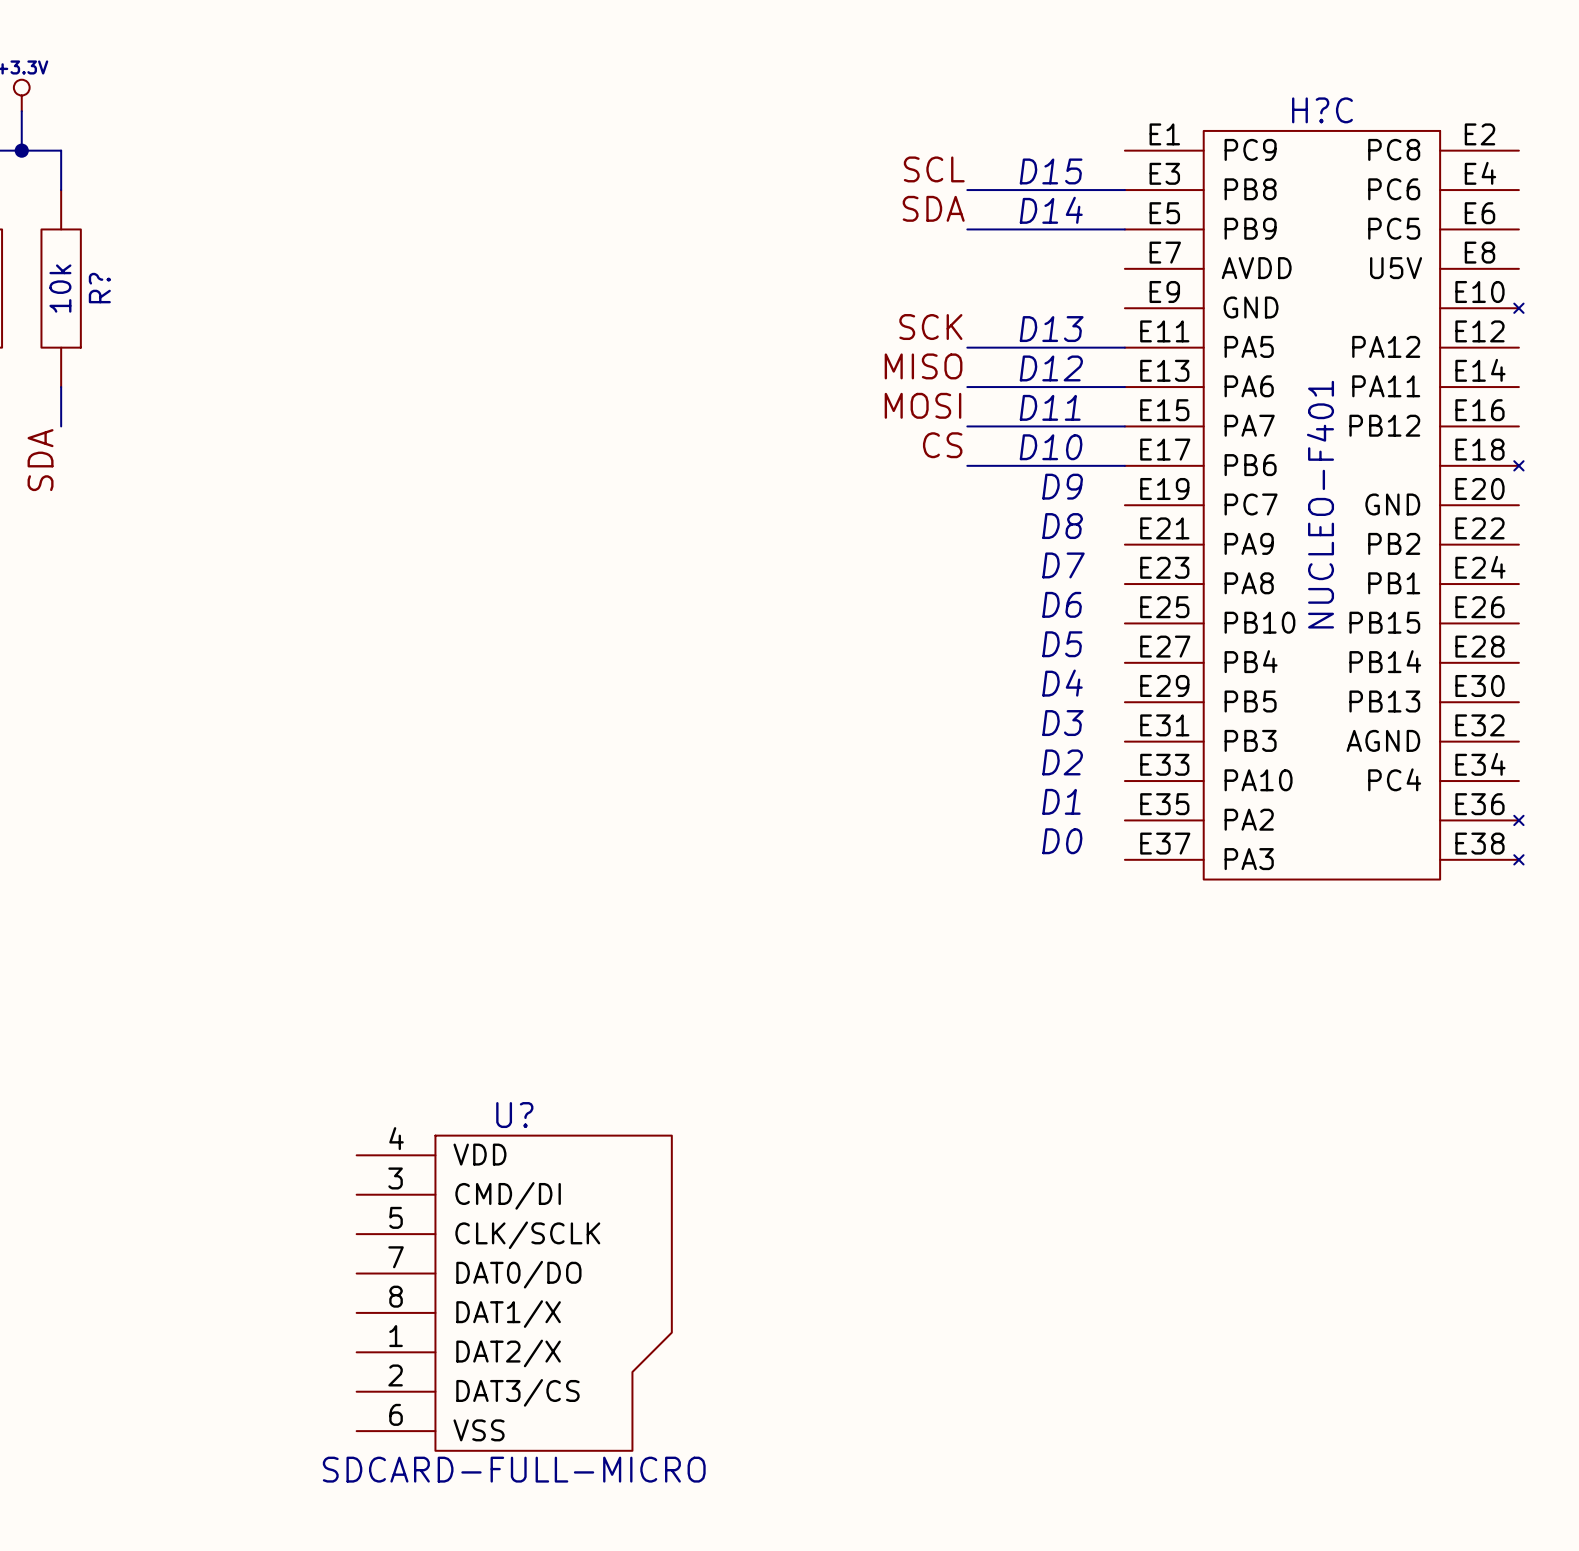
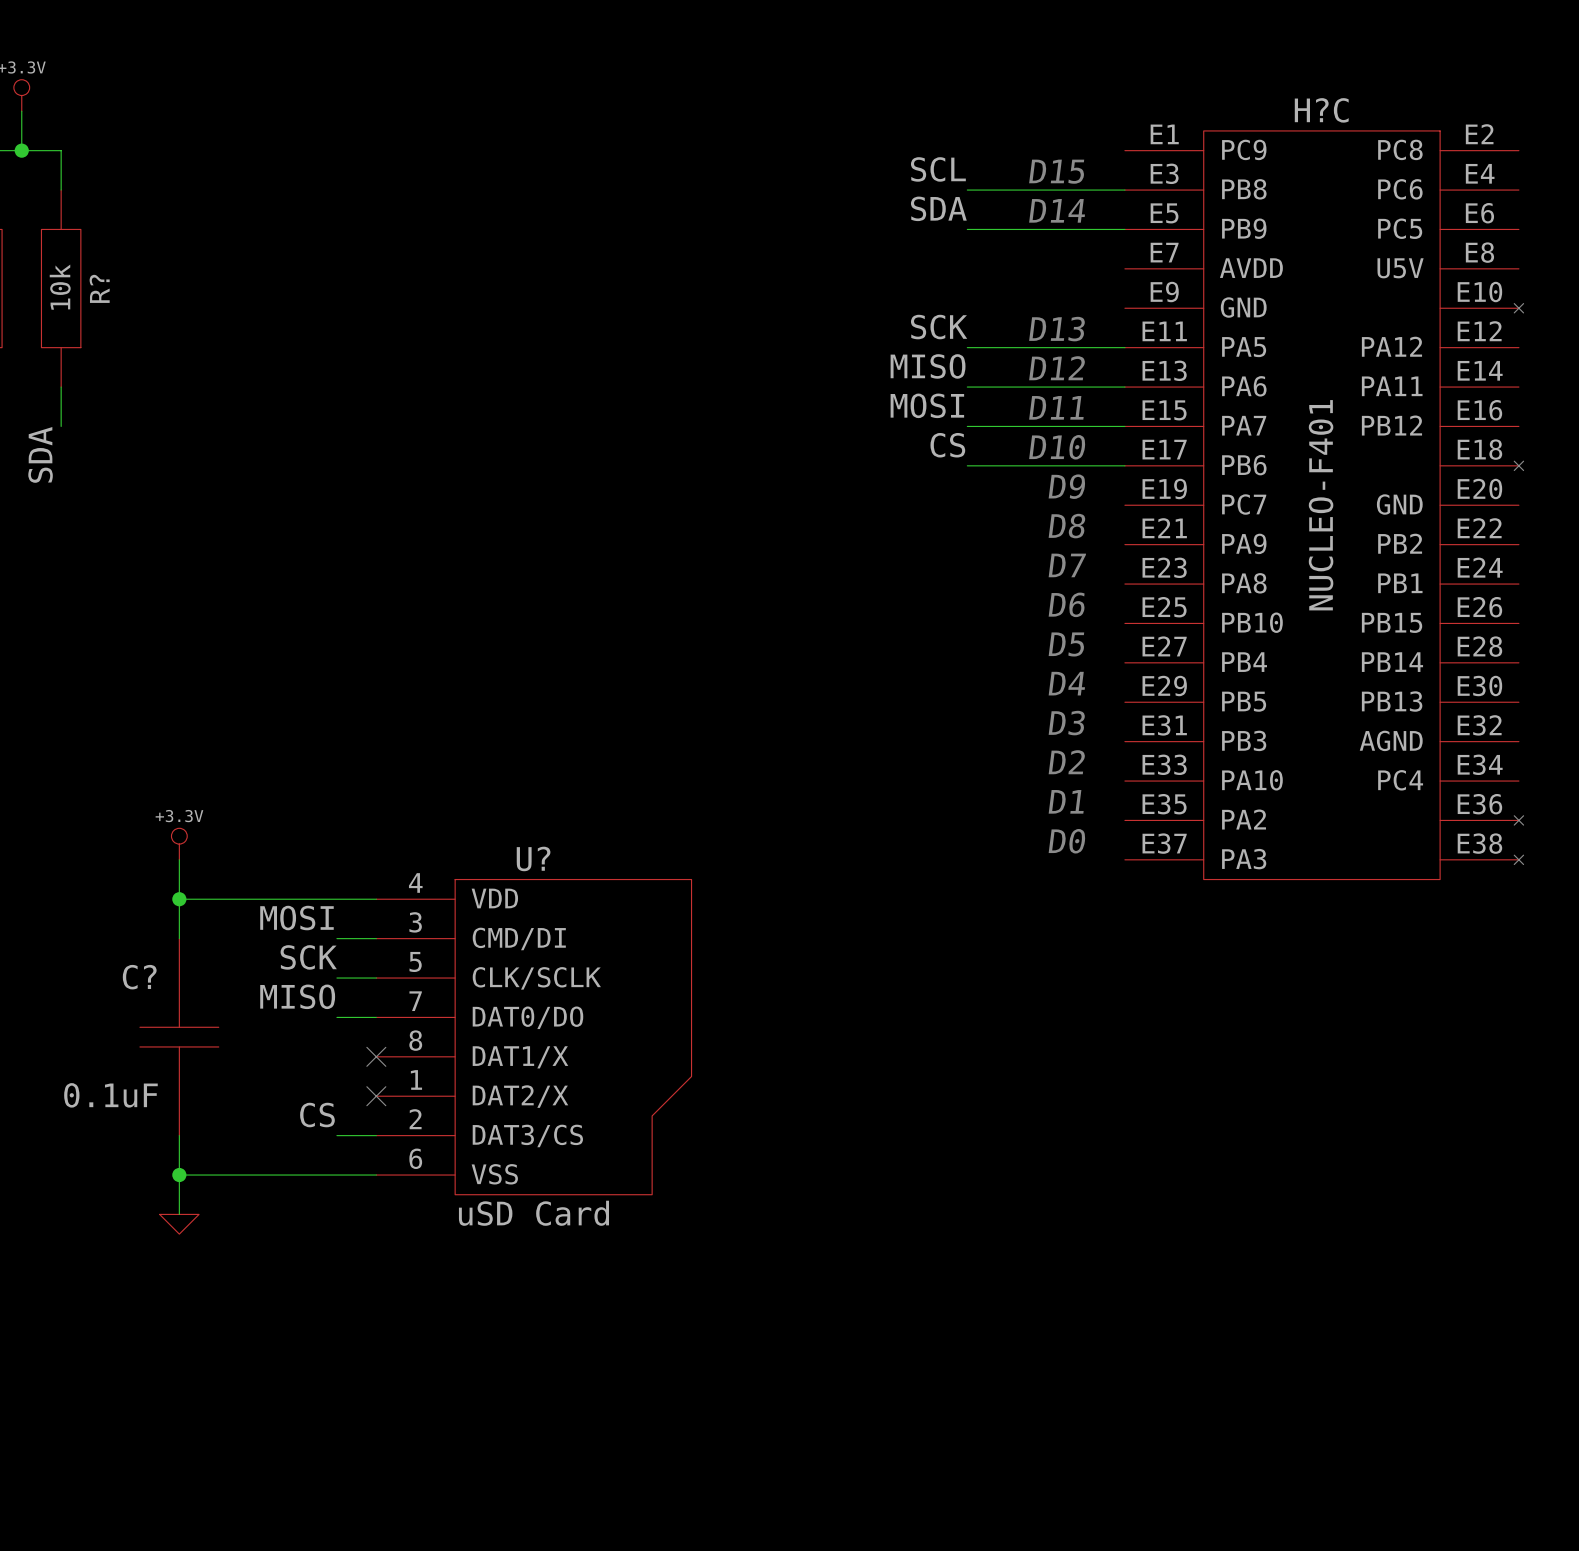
power symbol: none -> +3.3V (179, 844)
wire: none -> (179, 859) (179, 938)
wire: none -> (179, 899) (376, 899)
junction: none -> (179, 899)
label: none -> MOSI (296, 918)
wire: none -> (336, 938) (376, 938)
label: none -> SCK (308, 957)
wire: none -> (336, 978) (376, 978)
label: none -> MISO (297, 996)
wire: none -> (336, 1017) (376, 1017)
C?: none -> 0.1uF (179, 1037)
U?: none -> uSD Card (533, 1037)
no-connect mark: none -> (376, 1056)
no-connect mark: none -> (376, 1096)
label: none -> CS (317, 1115)
wire: none -> (179, 1135) (179, 1214)
wire: none -> (336, 1135) (376, 1135)
wire: none -> (179, 1175) (376, 1175)
junction: none -> (179, 1175)
power symbol: none -> (179, 1224)
U?: SDCARD-FULL-MICRO (514, 1293) -> none

